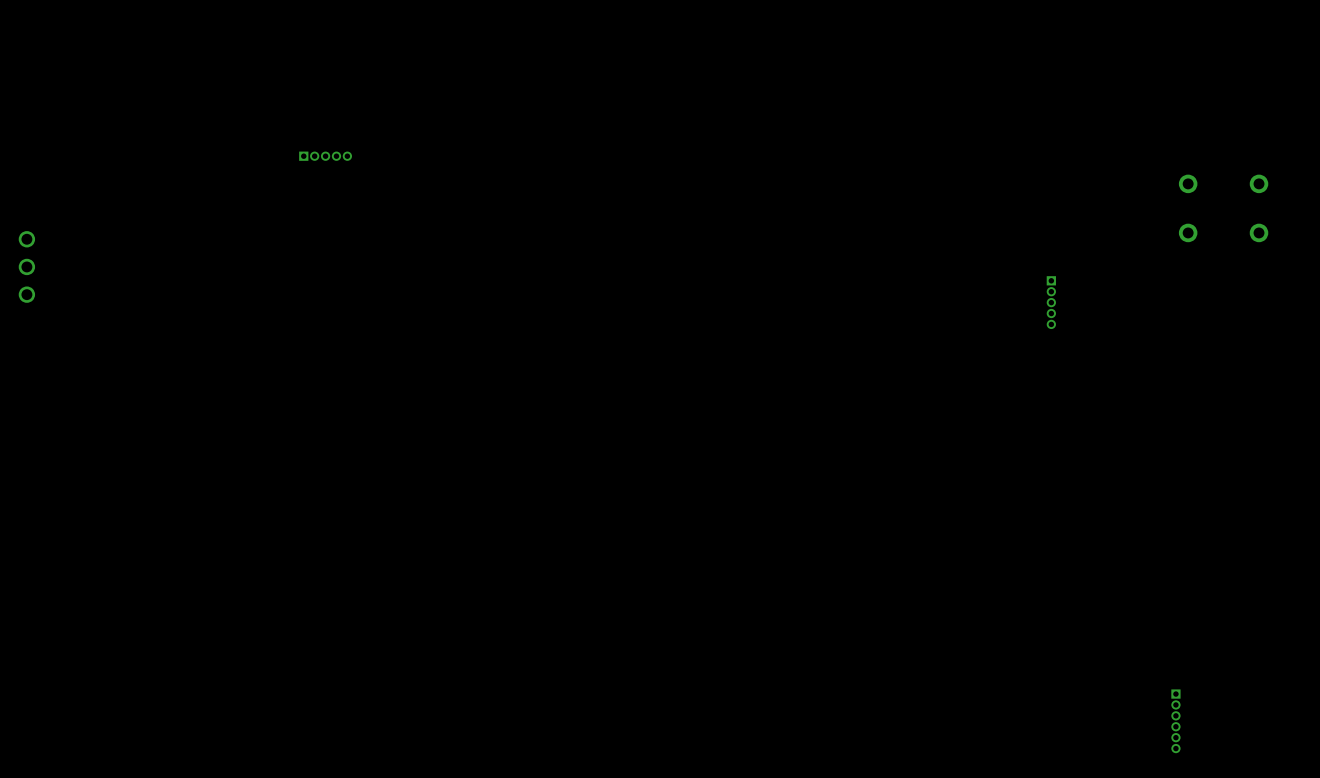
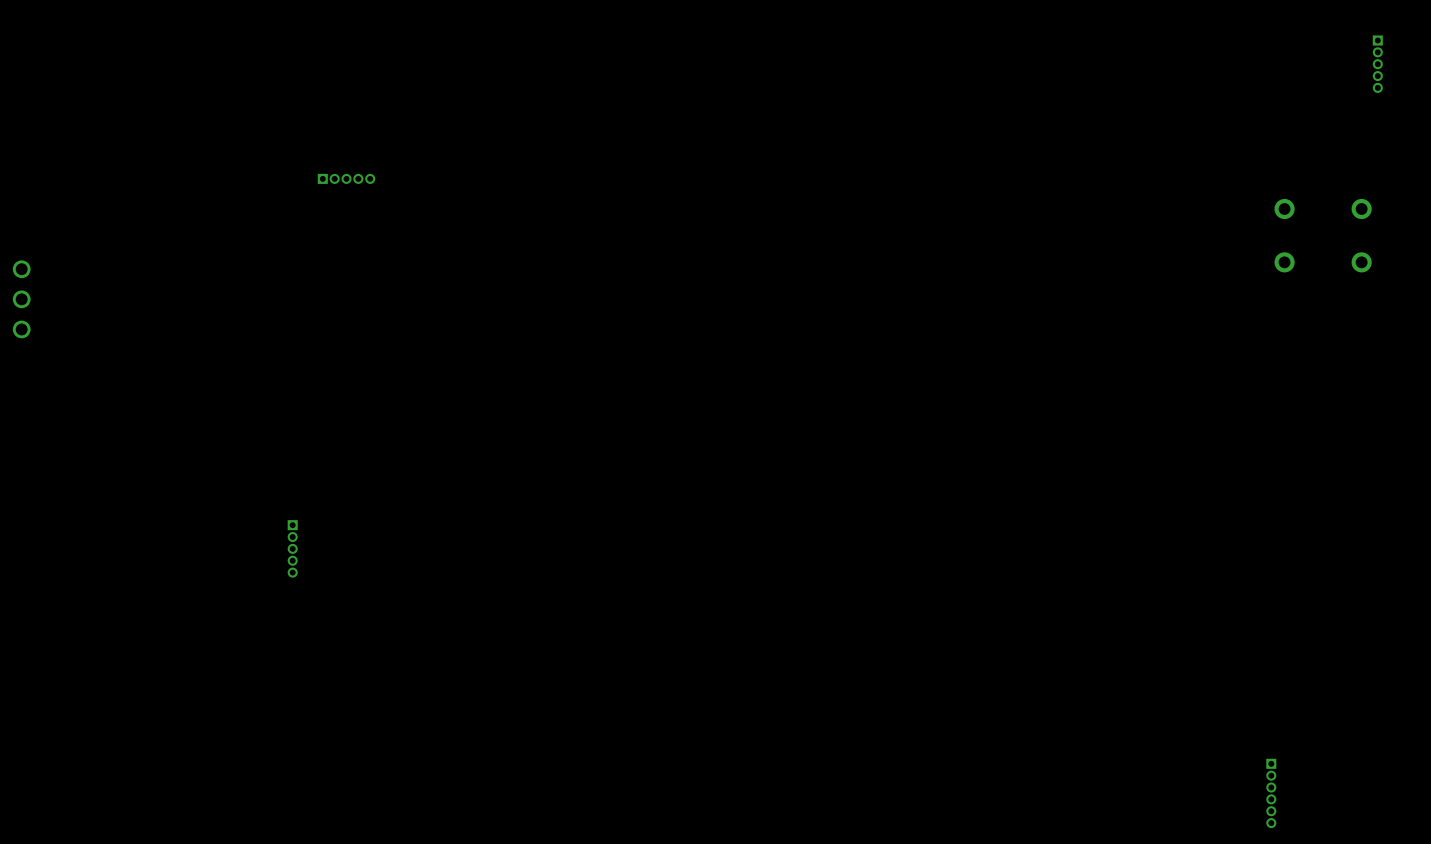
part: none -> (1377, 64)
part: (1051, 302) -> none
part: none -> (292, 548)

